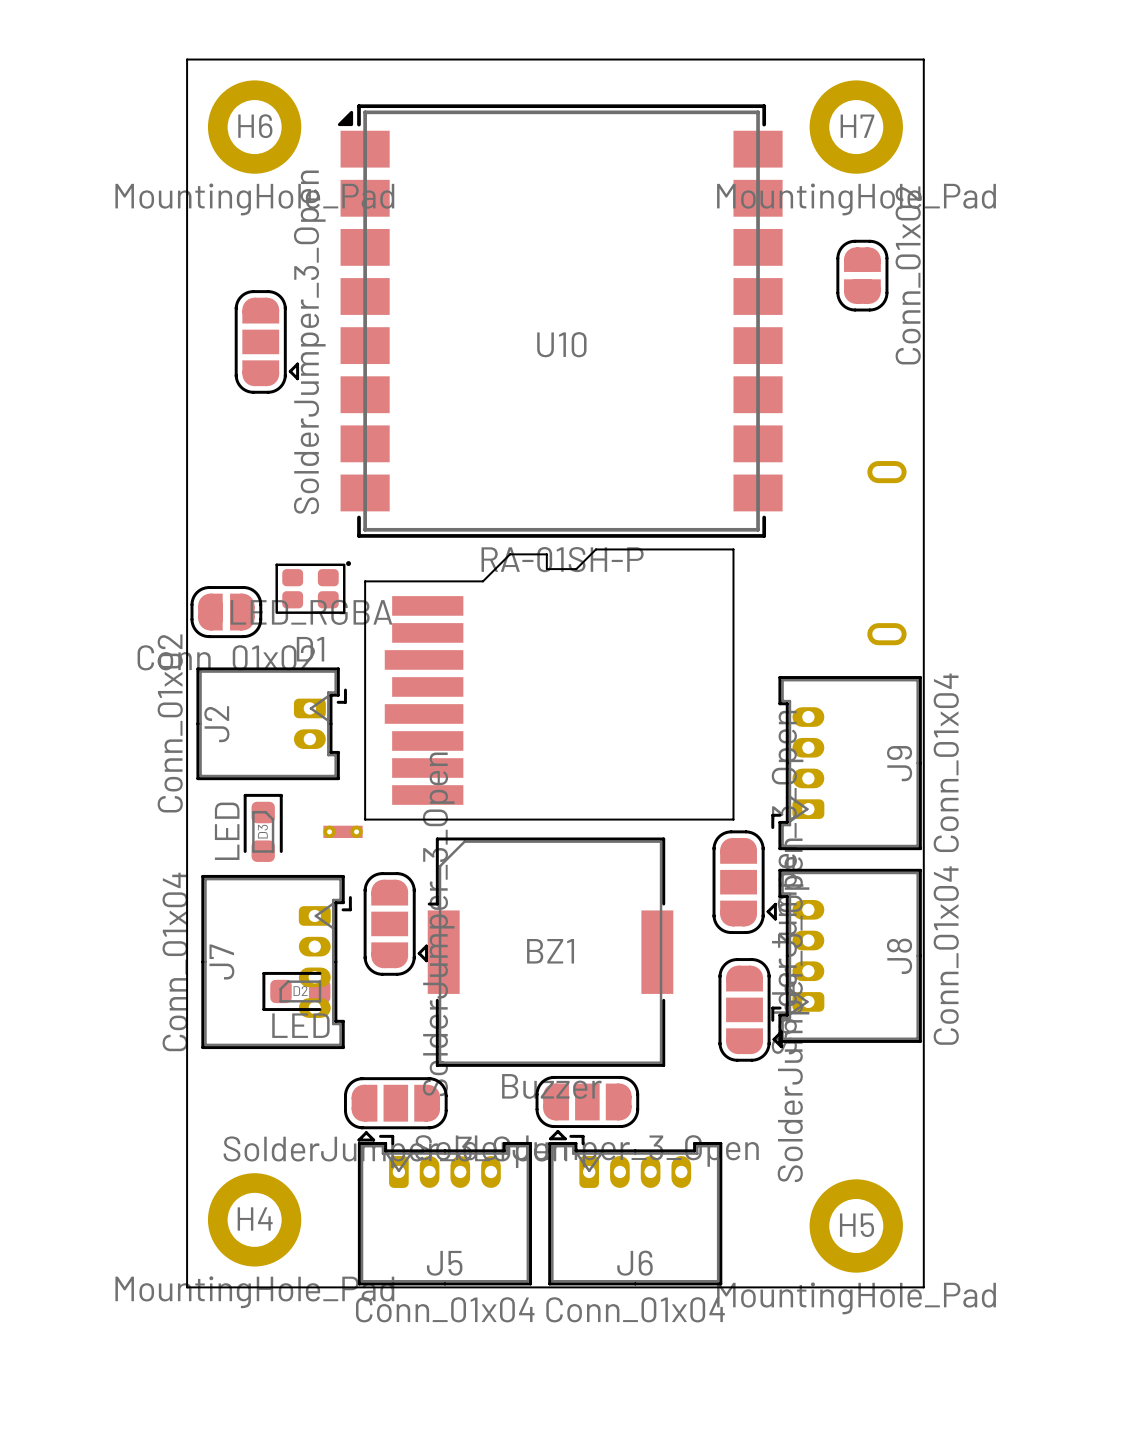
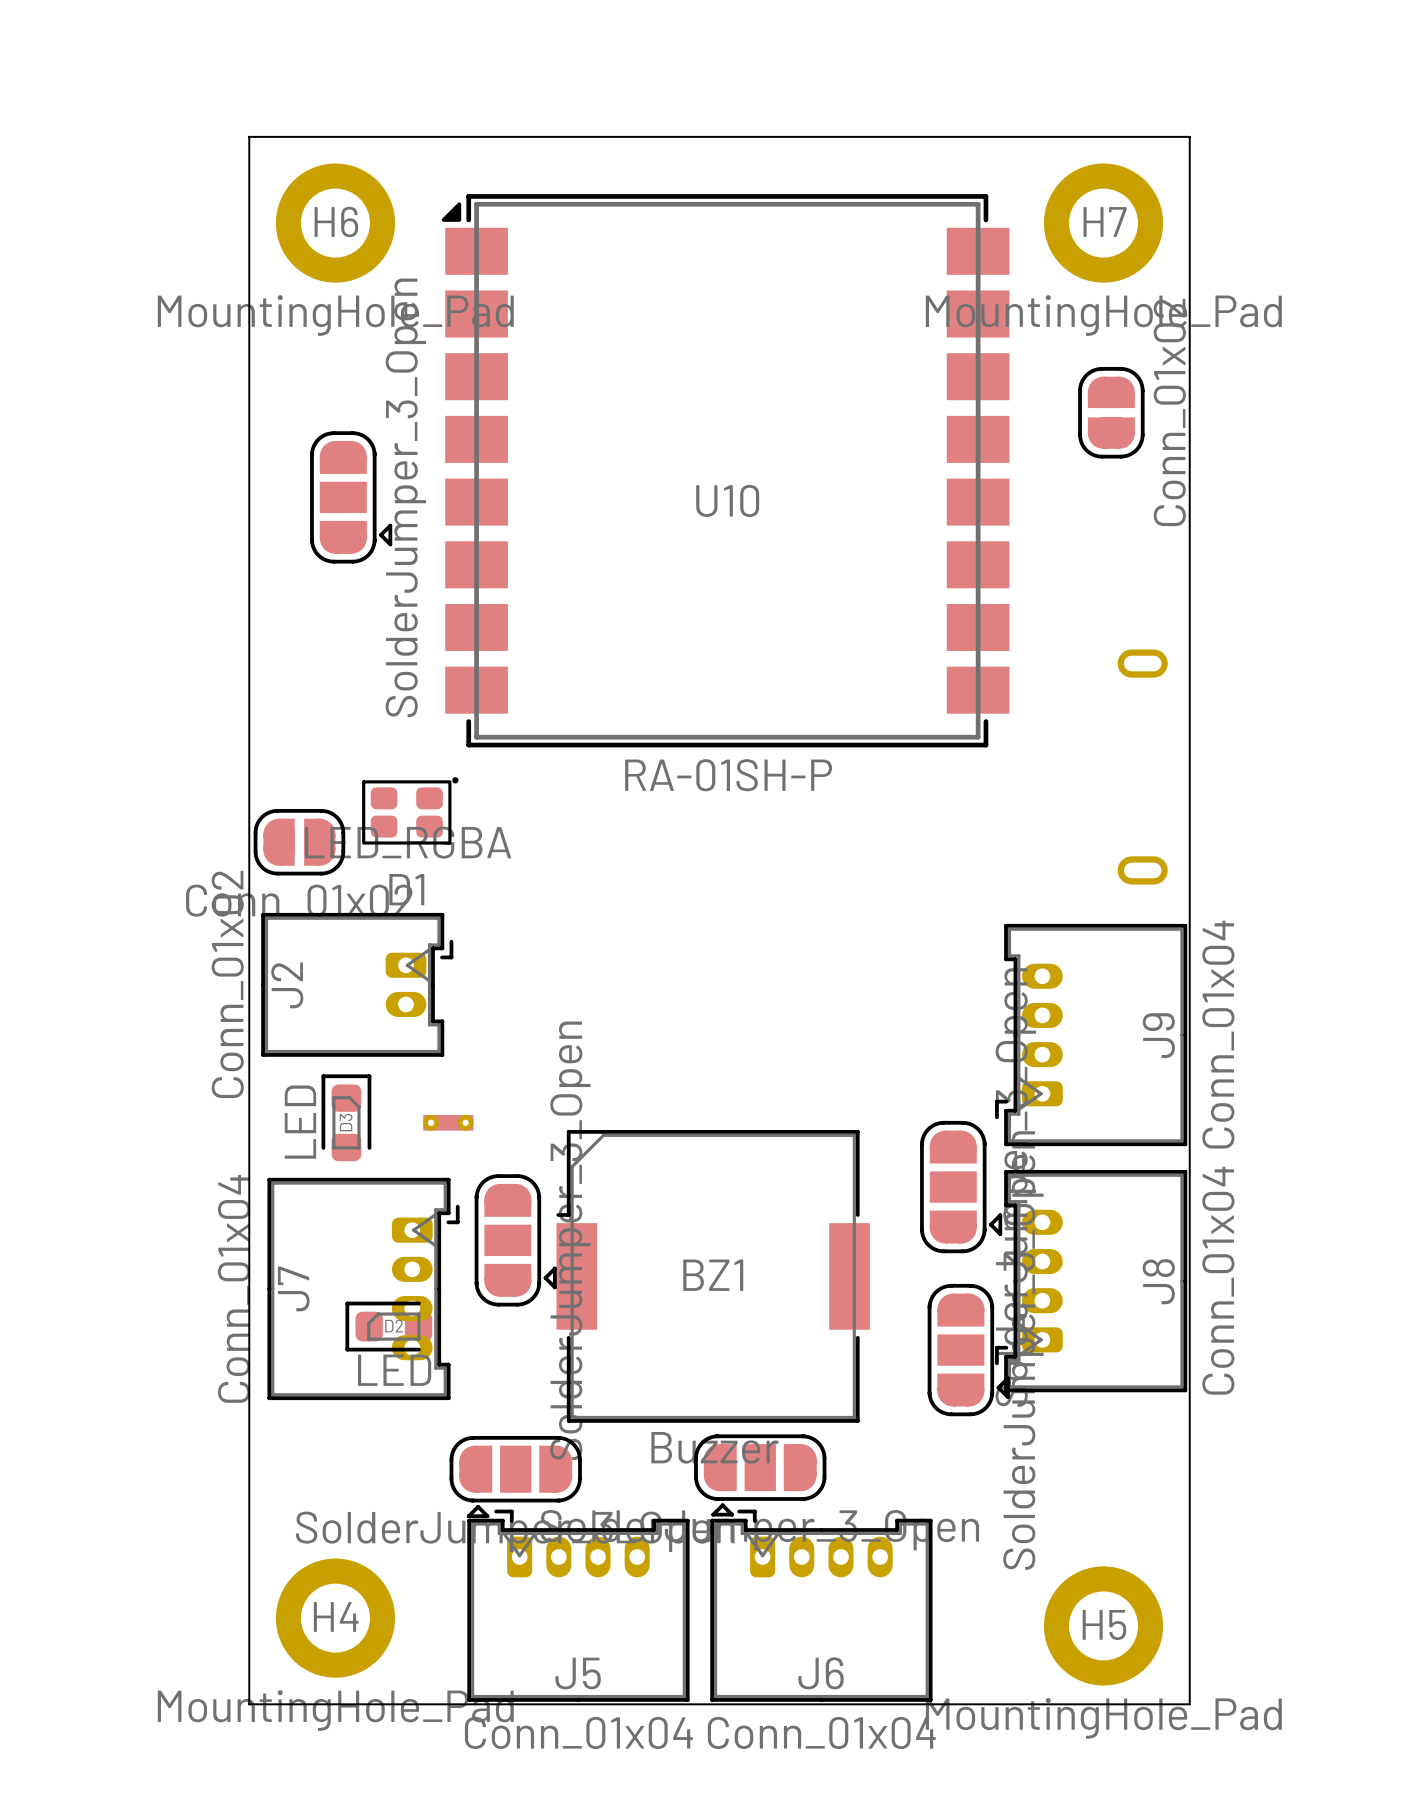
part: (549, 684) -> none

